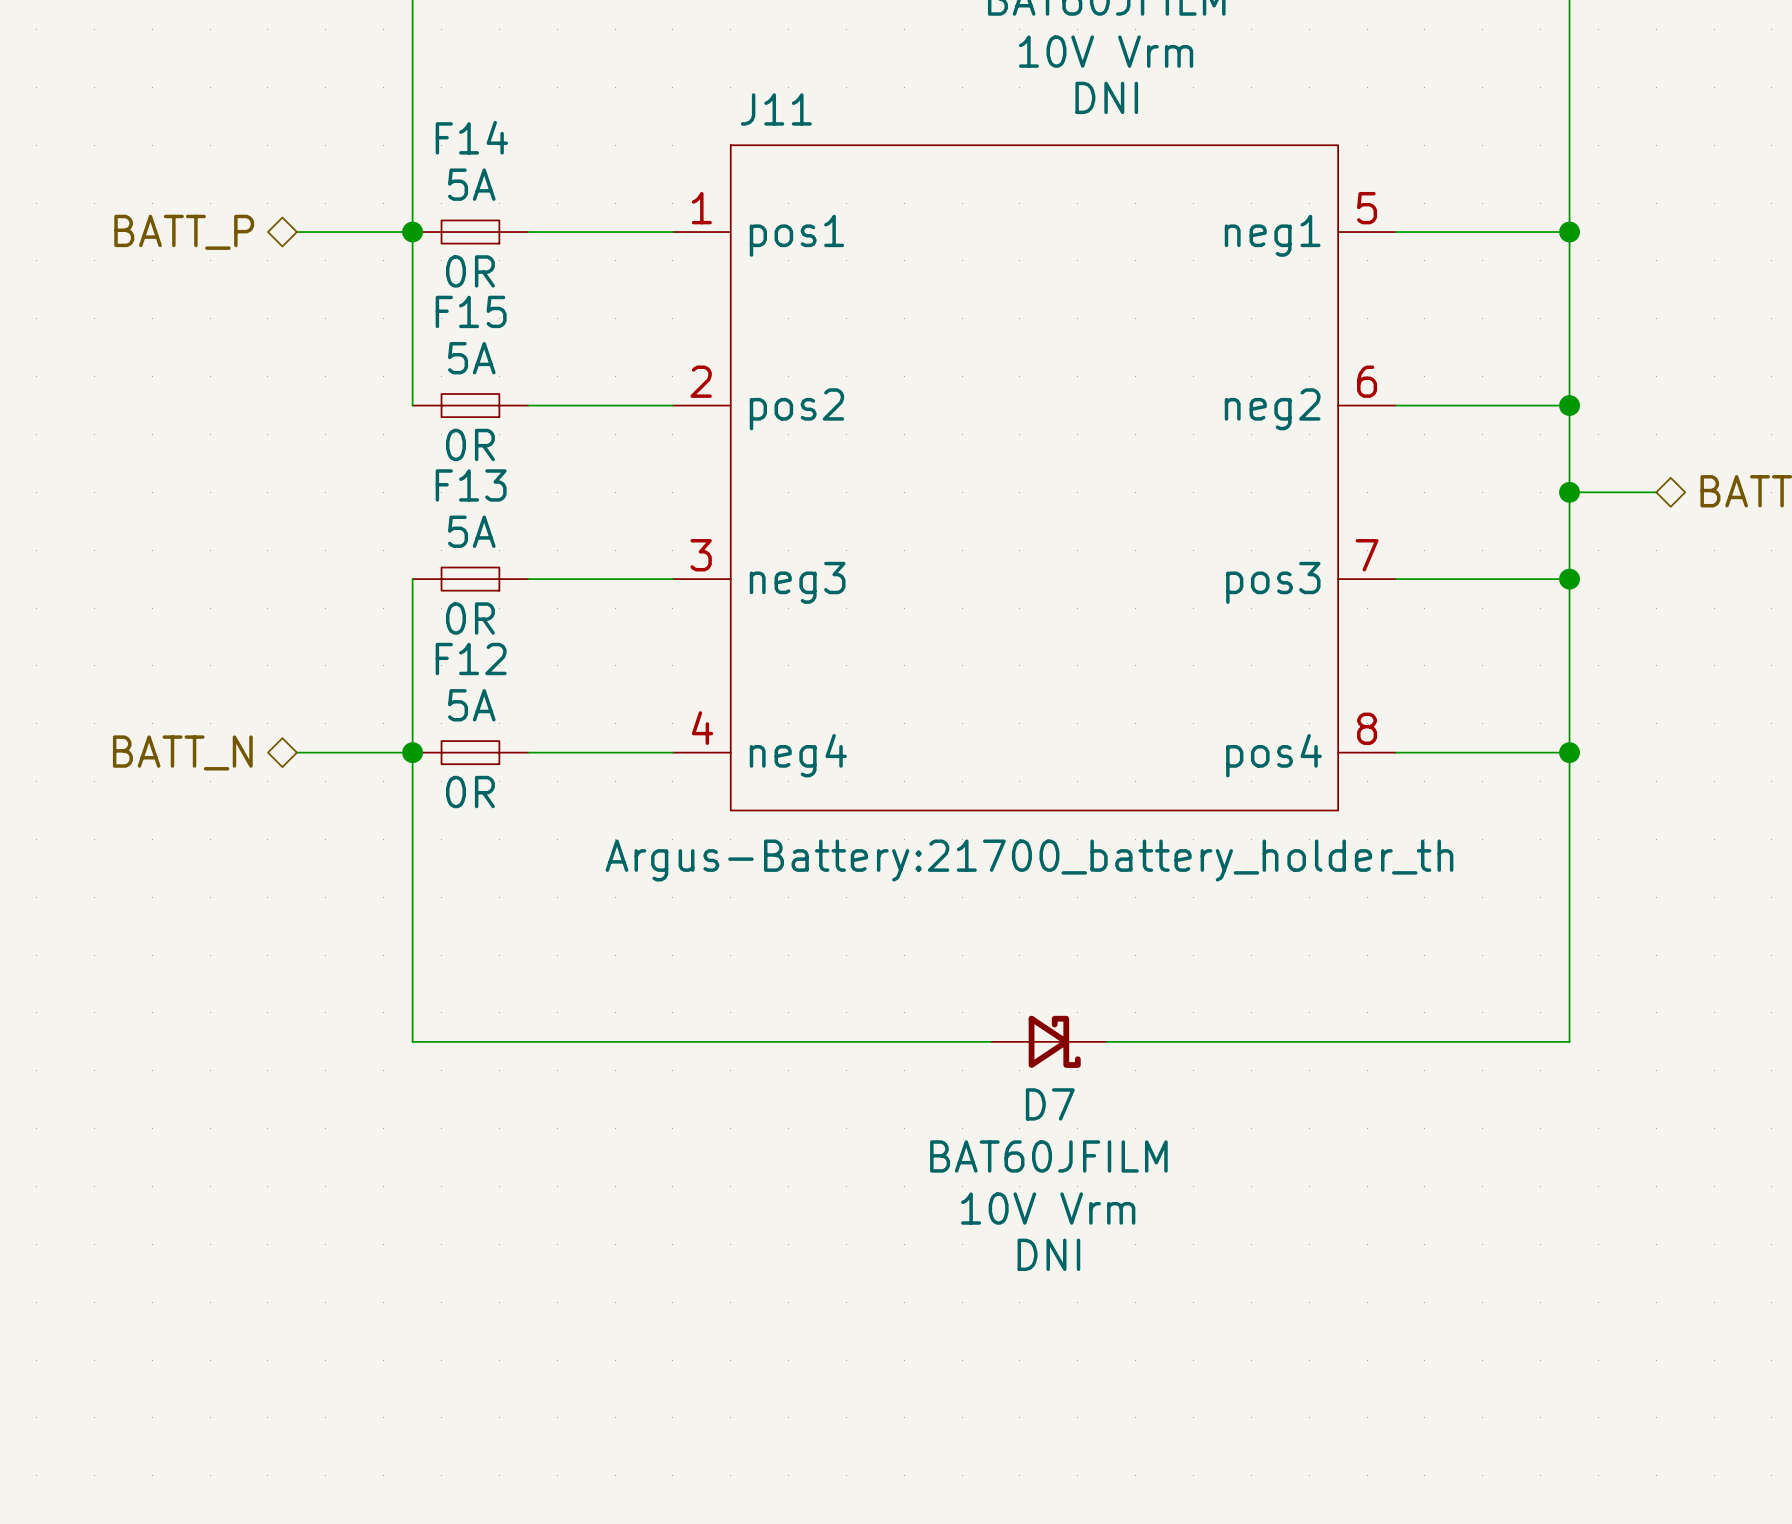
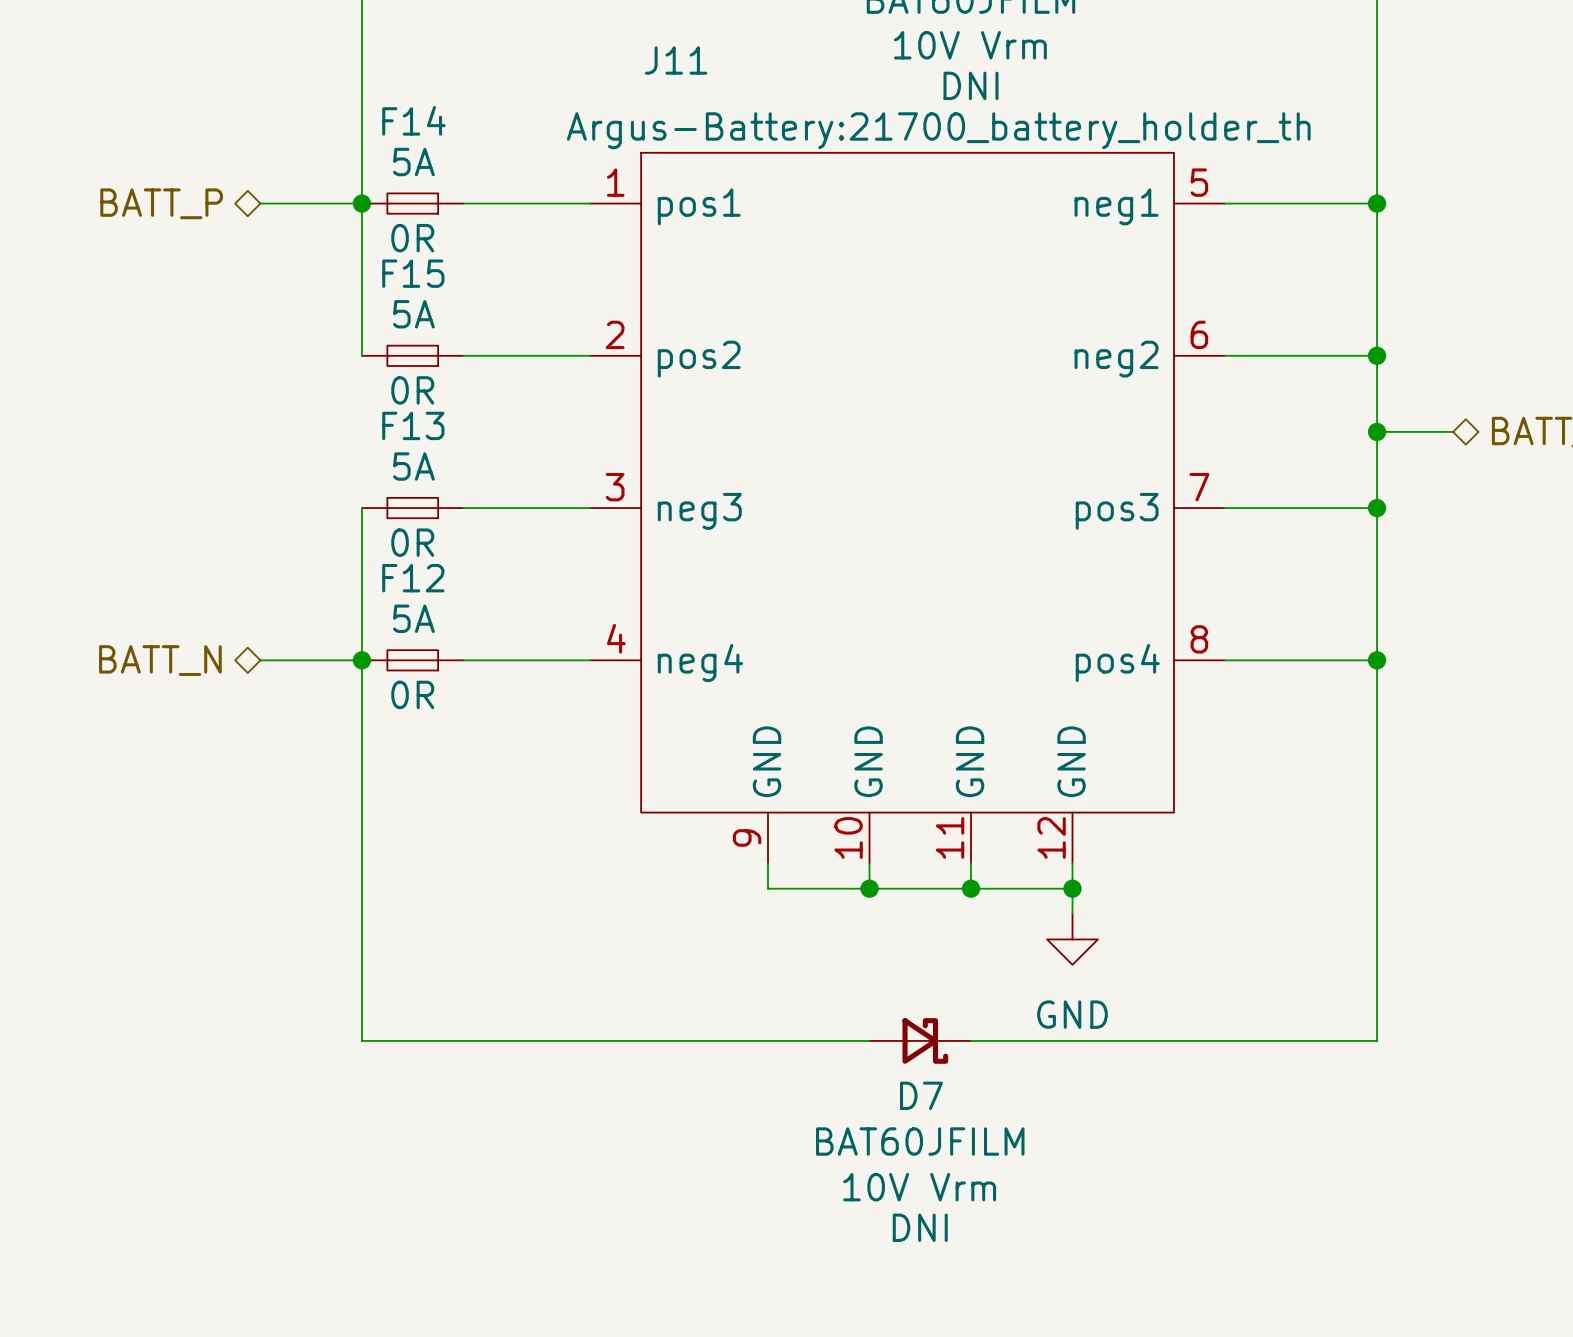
J11 name position: J11 (776, 109) -> J11 (676, 60)
J11 symbol: [672, 145, 1396, 811] -> [590, 152, 1225, 864]
J11 text position: Argus-Battery:21700_battery_holder_th (1029, 860) -> Argus-Battery:21700_battery_holder_th (938, 130)
wire: none -> (768, 863) (768, 888) (1072, 888)
wire: none -> (869, 863) (869, 888)
wire: none -> (971, 863) (971, 888)
wire: none -> (1072, 863) (1072, 914)
junction: none -> (869, 888)
junction: none -> (971, 888)
junction: none -> (1072, 888)
wire: (412, 1041) (991, 1041) -> (361, 914) (361, 1040) (869, 1040)
D7 position: (1048, 1041) -> (920, 1040)
wire: (1106, 1041) (1569, 1041) -> (971, 1040) (1377, 1040) (1377, 914)
power symbol: none -> GND (1072, 939)

